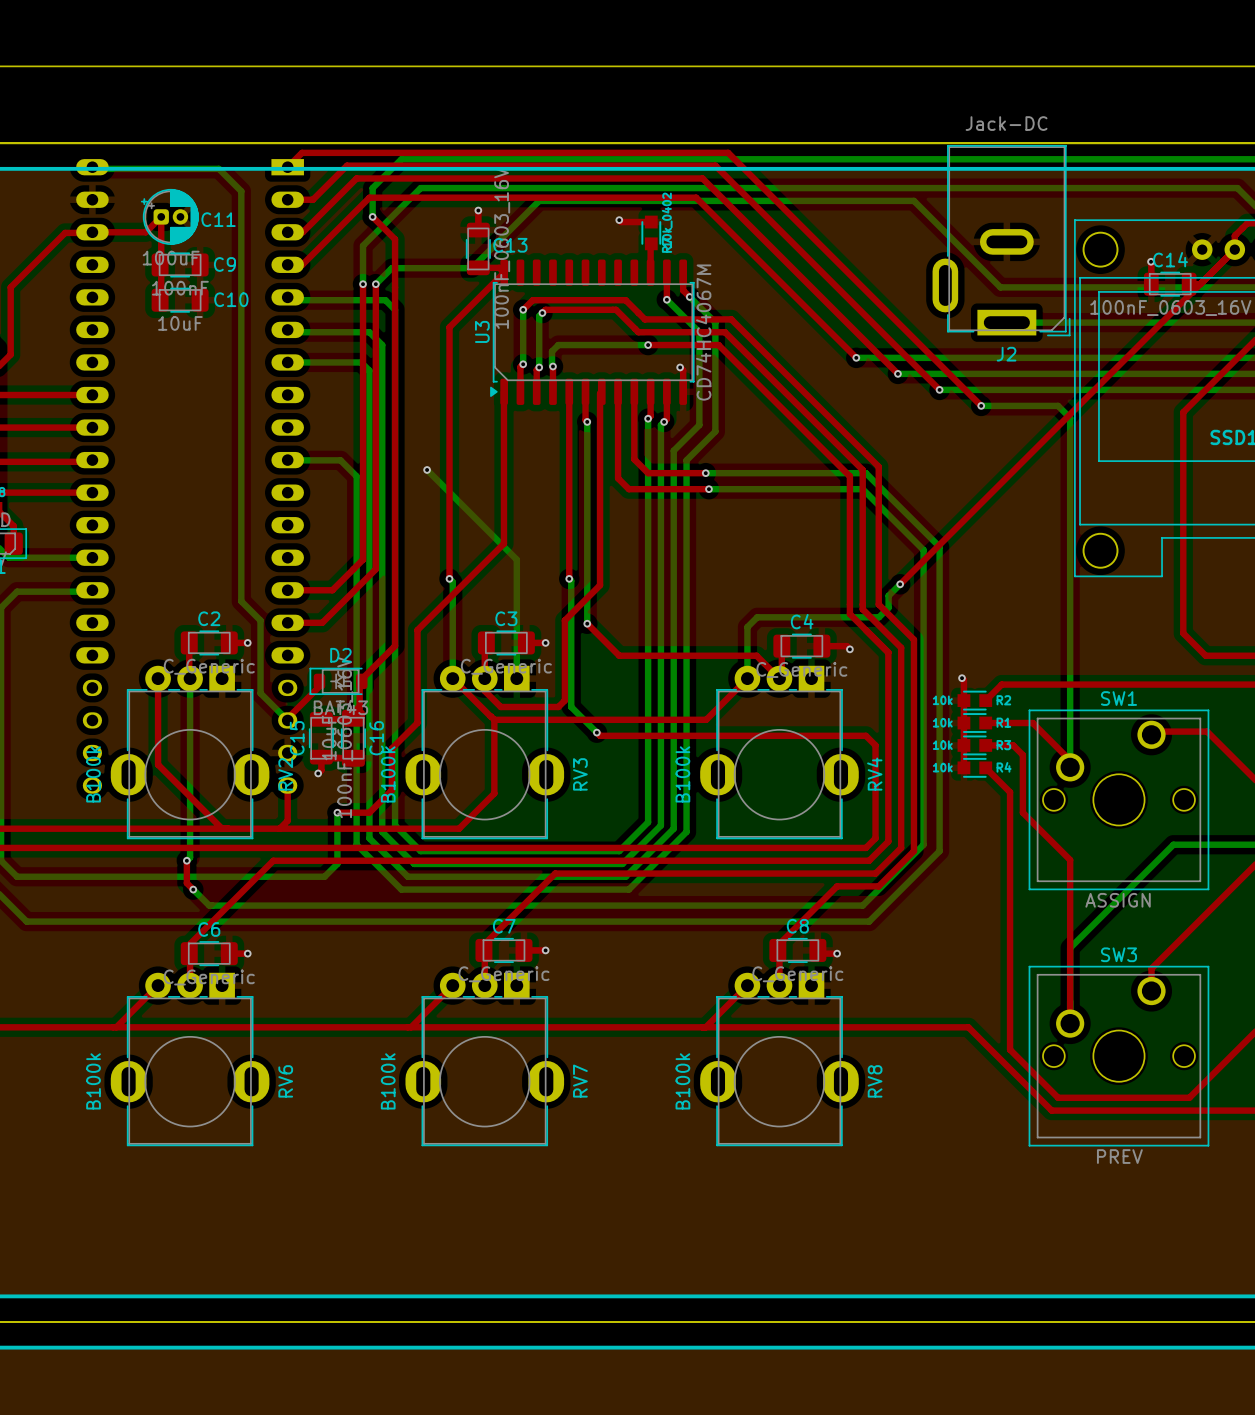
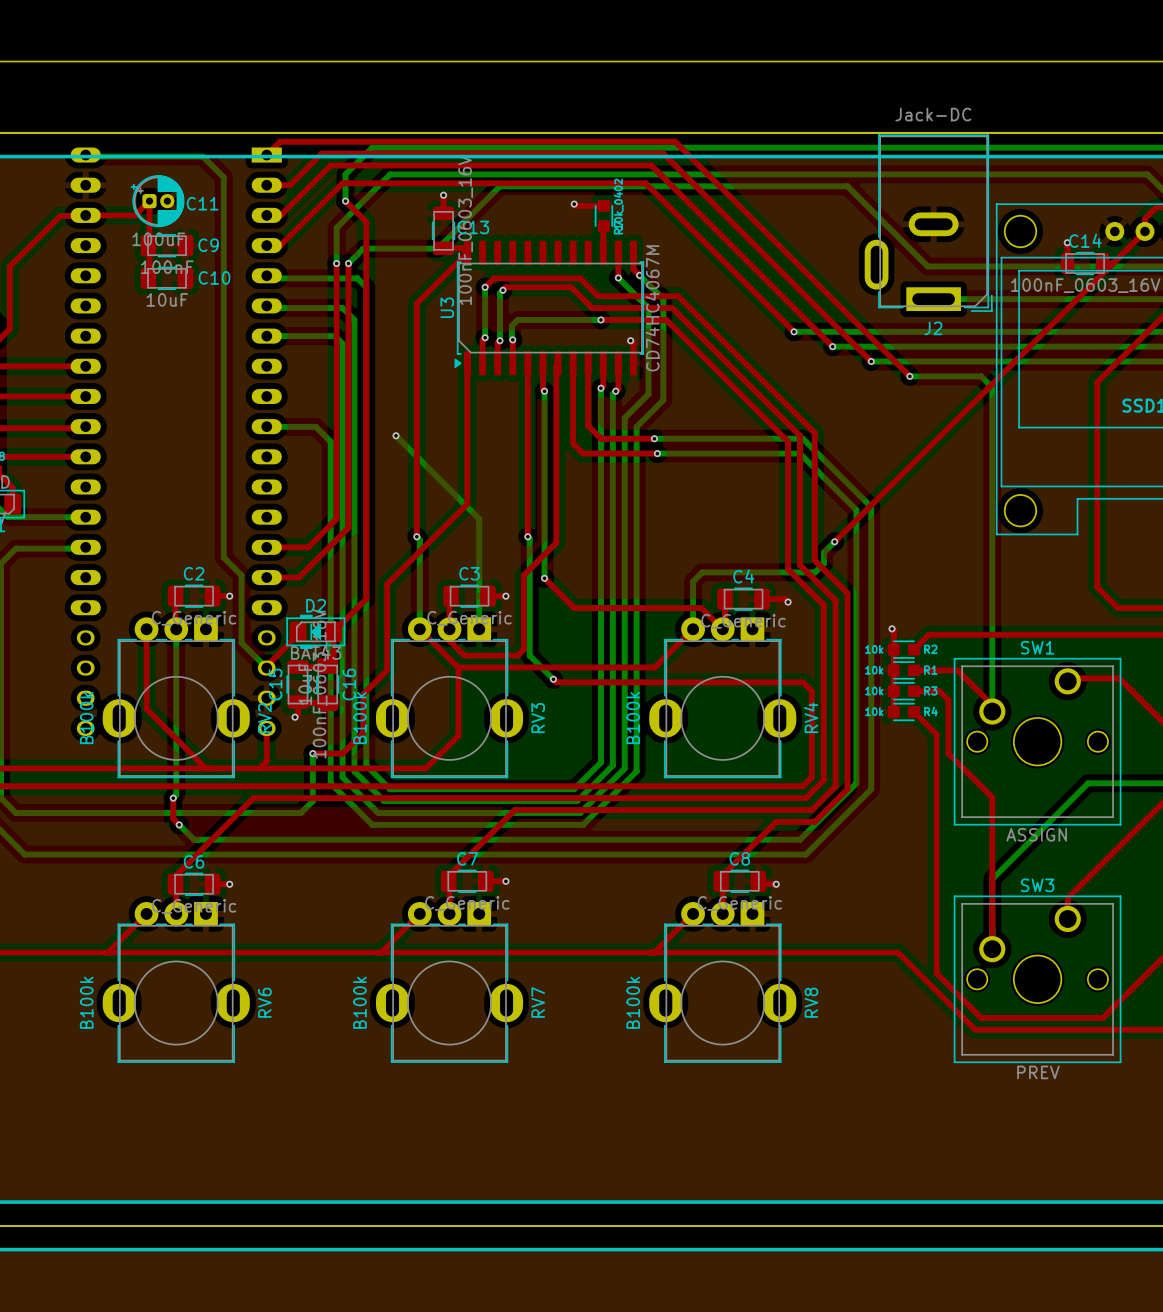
D2 footprint: [309, 667, 368, 695] -> [286, 614, 346, 650]

